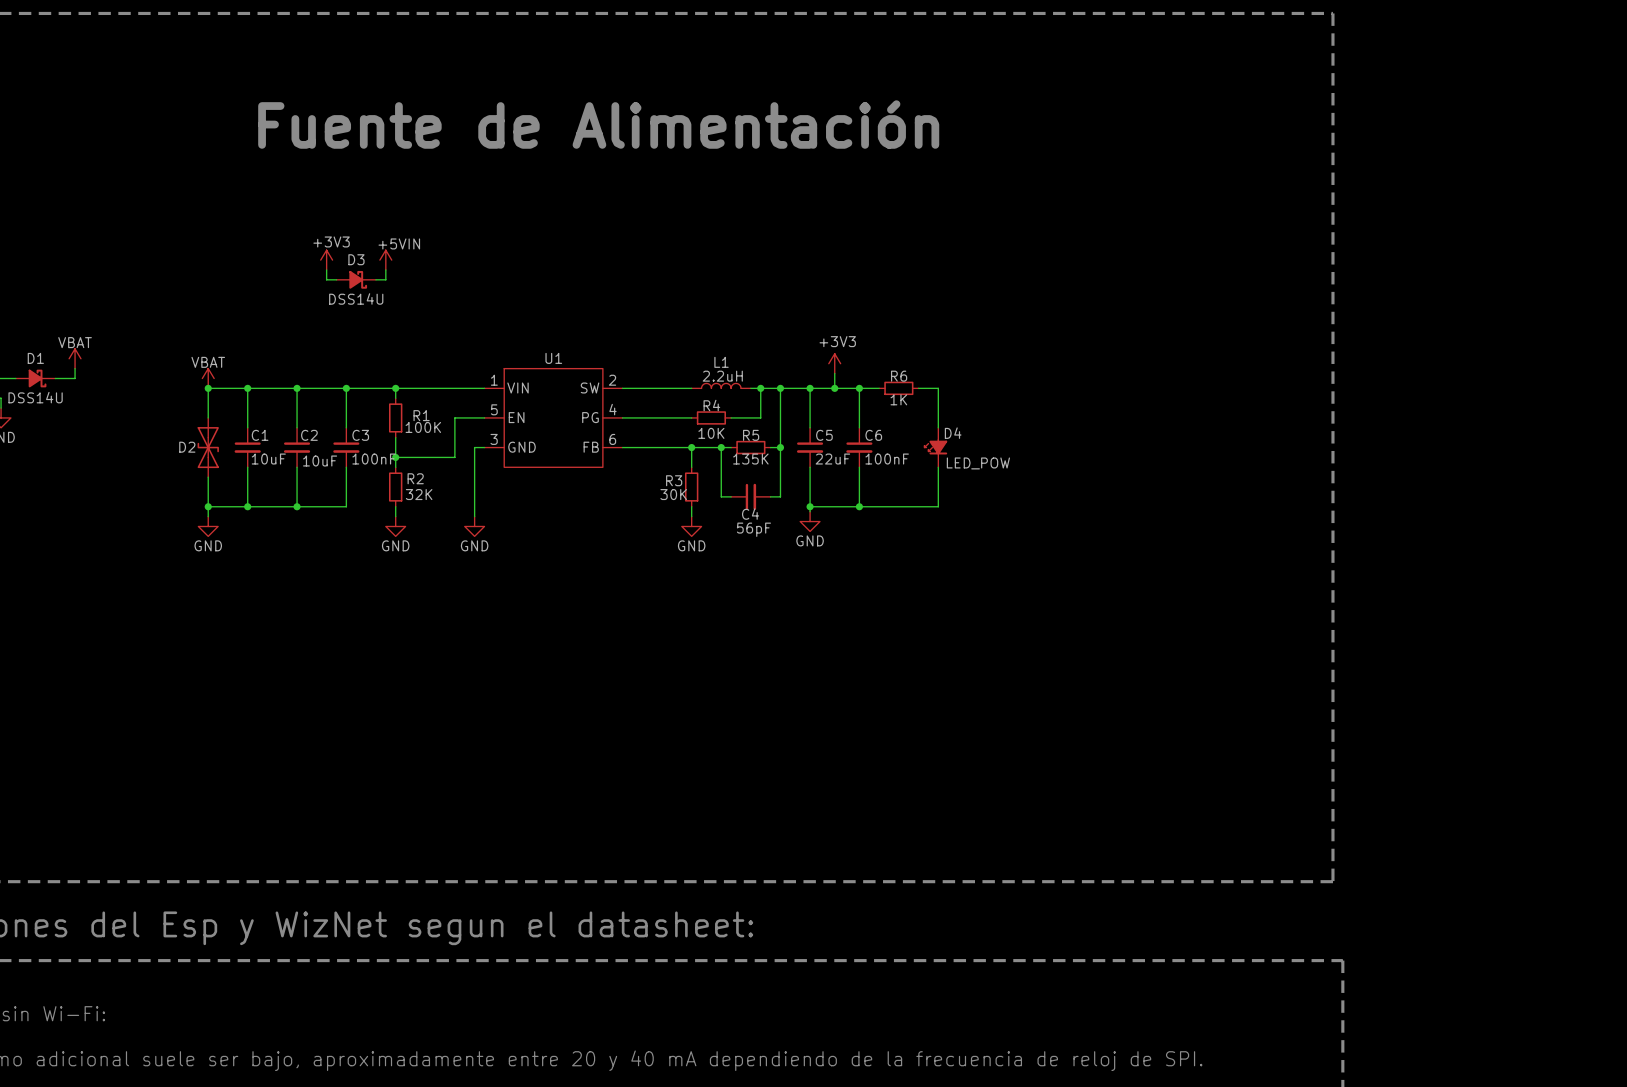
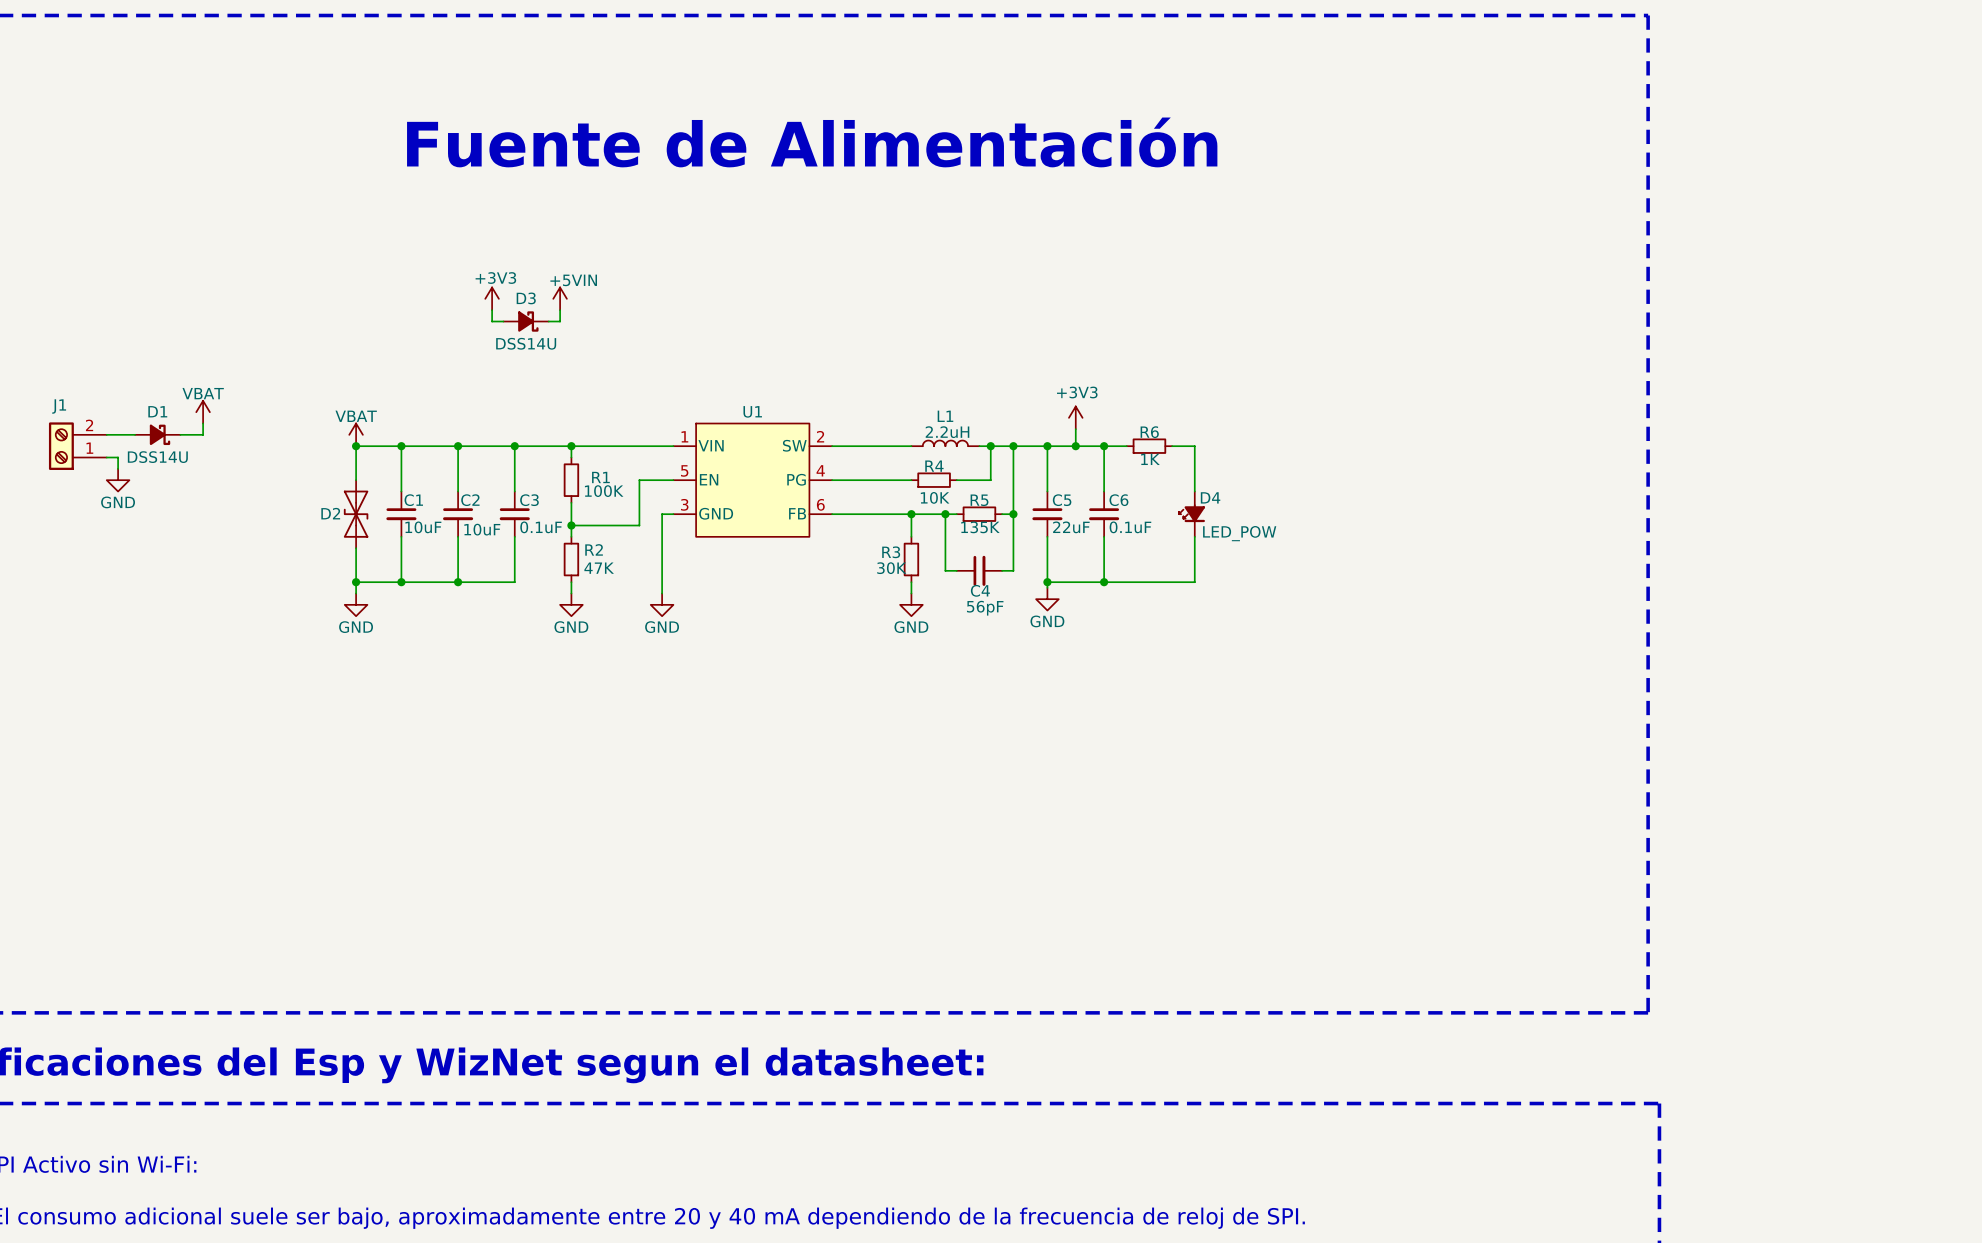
C3 value: 100nF (374, 459) -> 0.1uF (541, 527)
C6 value: 100nF (887, 459) -> 0.1uF (1130, 527)
R2 value: 32K (419, 494) -> 47K (599, 568)

